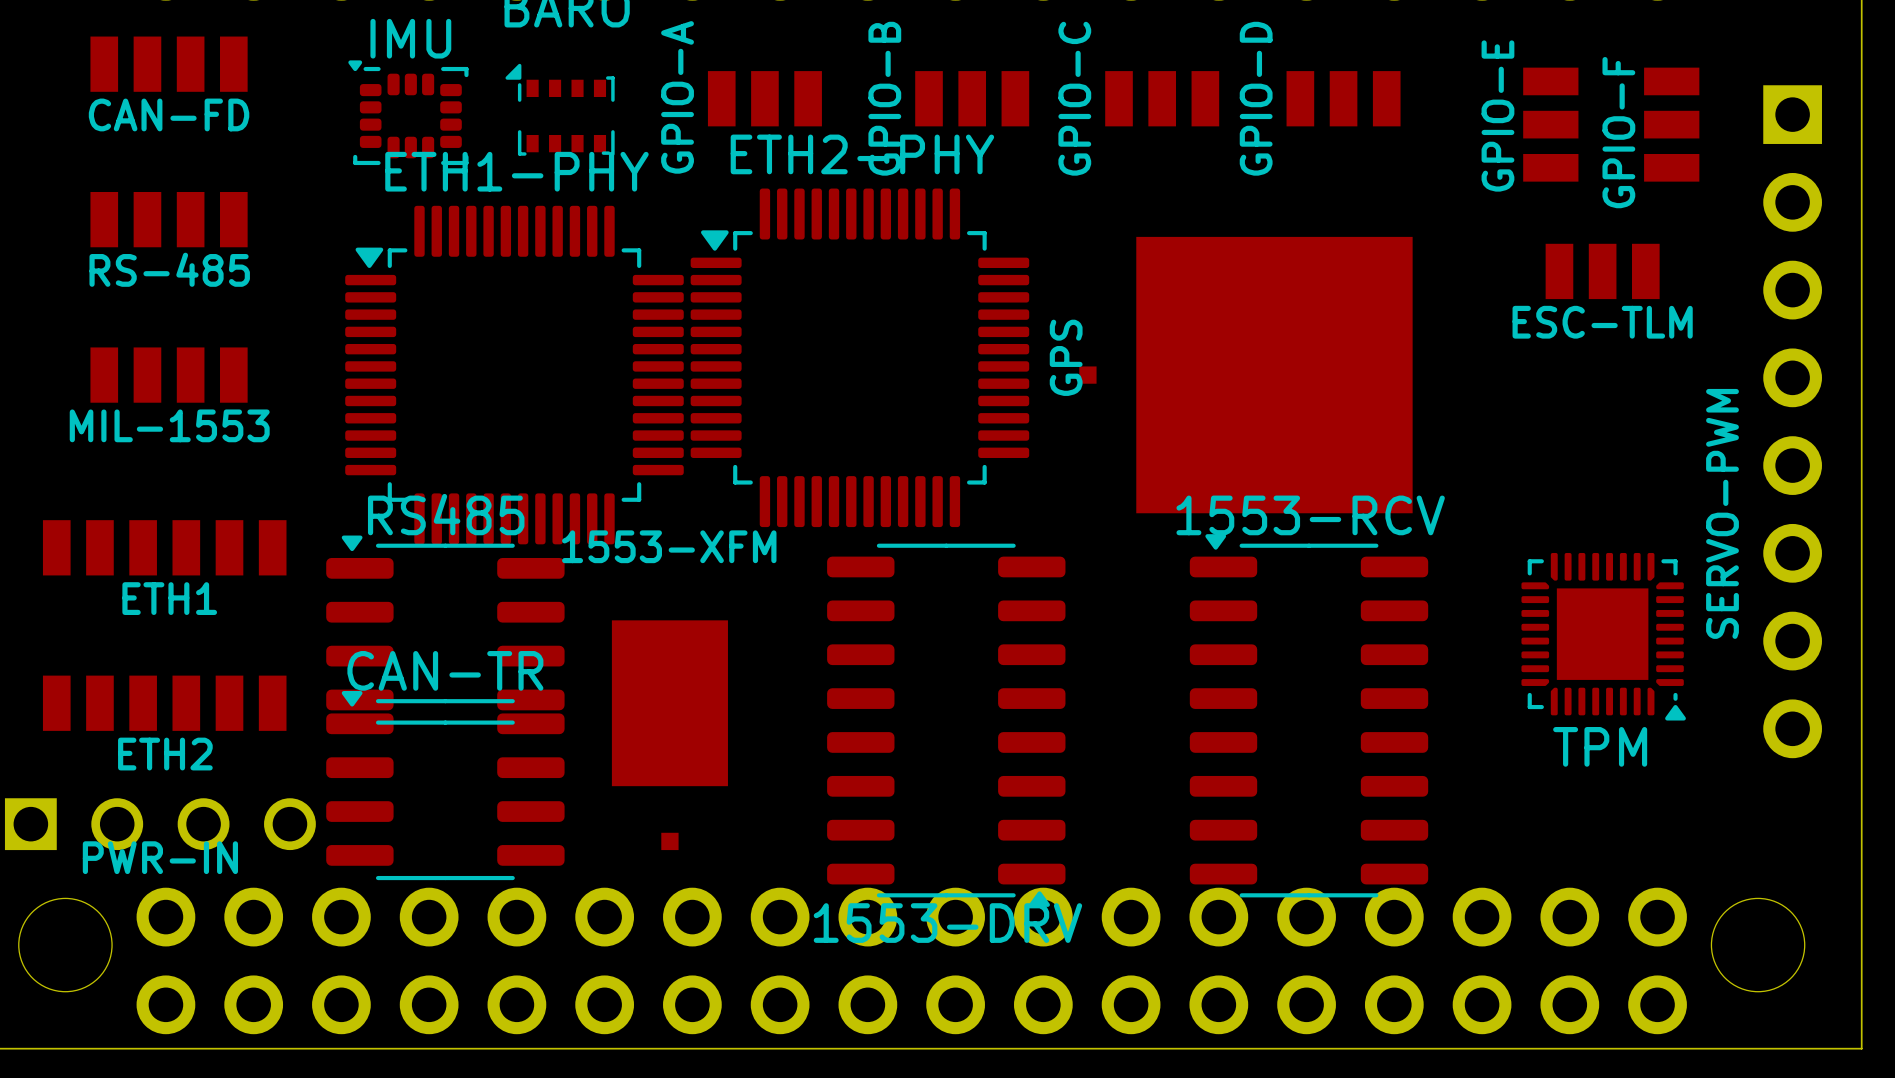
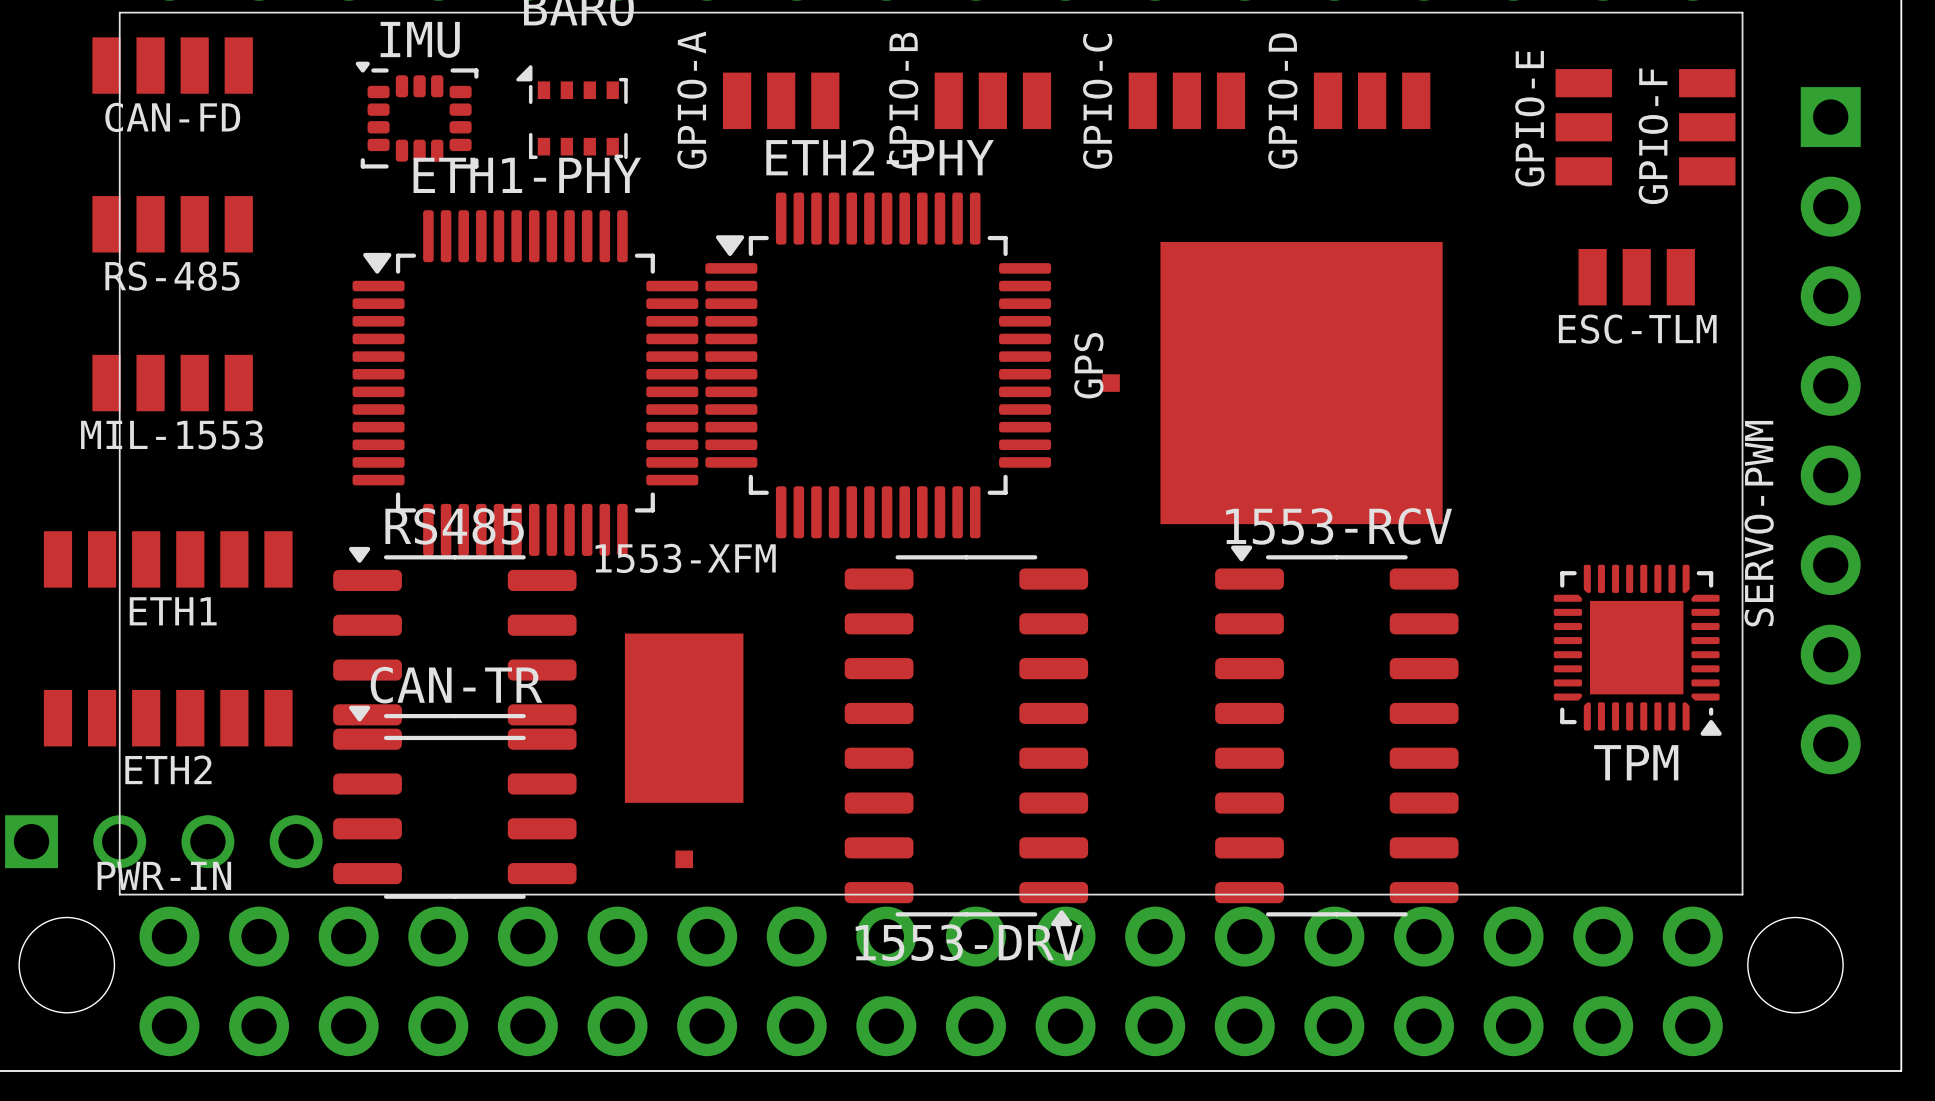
line: none -> (119, 12) (1742, 12) (1742, 894) (119, 894) (119, 12)

